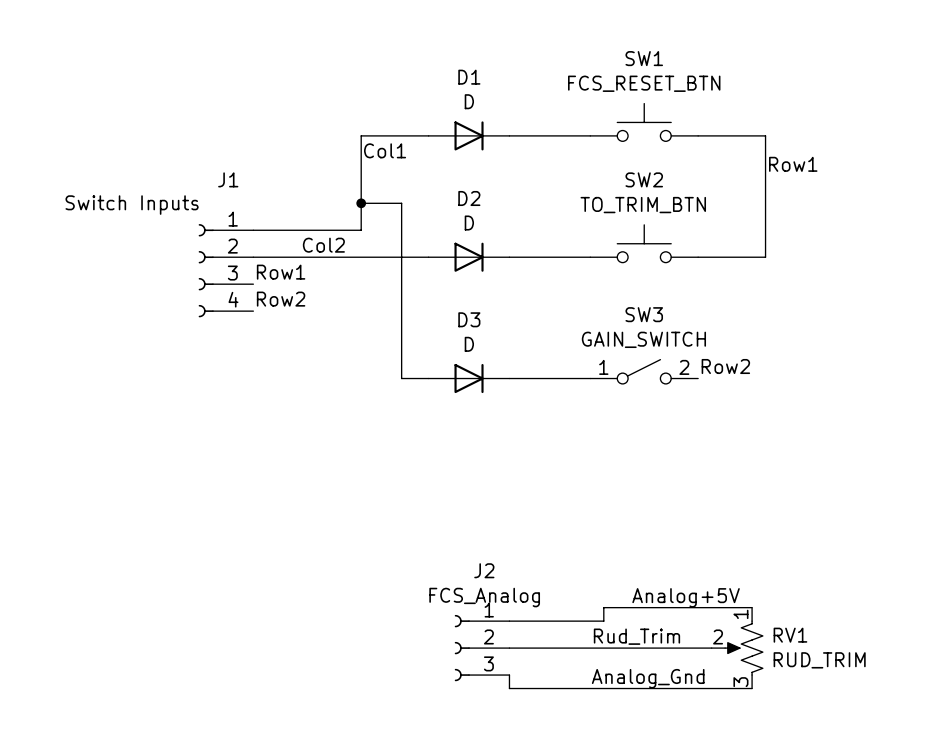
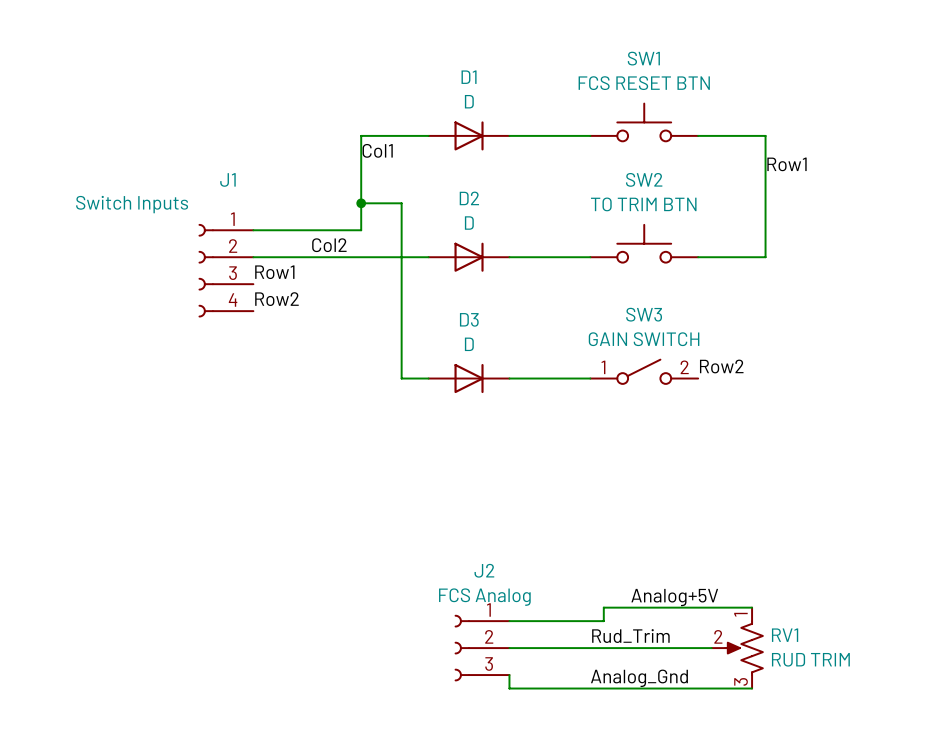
SW1 value: FCS_RESET_BTN (644, 83) -> FCS RESET BTN (644, 83)
SW2 value: TO_TRIM_BTN (643, 205) -> TO TRIM BTN (643, 204)
SW3 value: GAIN_SWITCH (643, 339) -> GAIN SWITCH (644, 339)
J2 value: FCS_Analog (484, 597) -> FCS Analog (484, 597)
RV1 value: RUD_TRIM (819, 660) -> RUD TRIM (810, 659)

